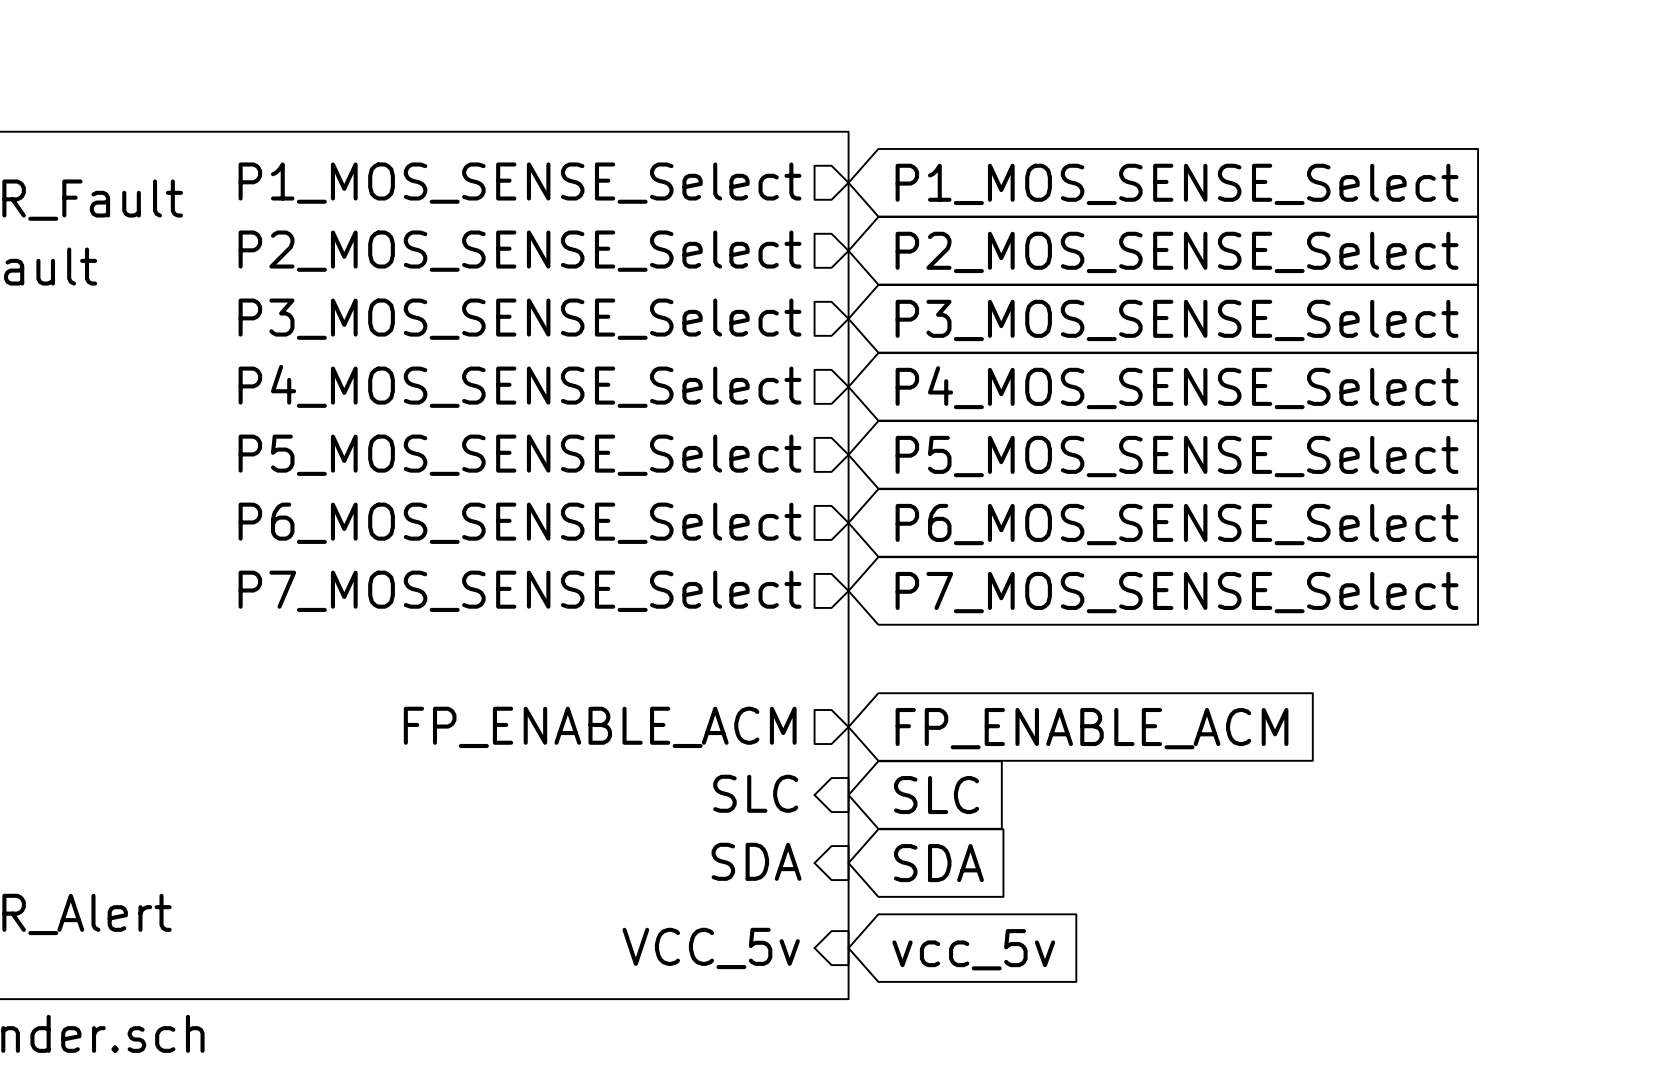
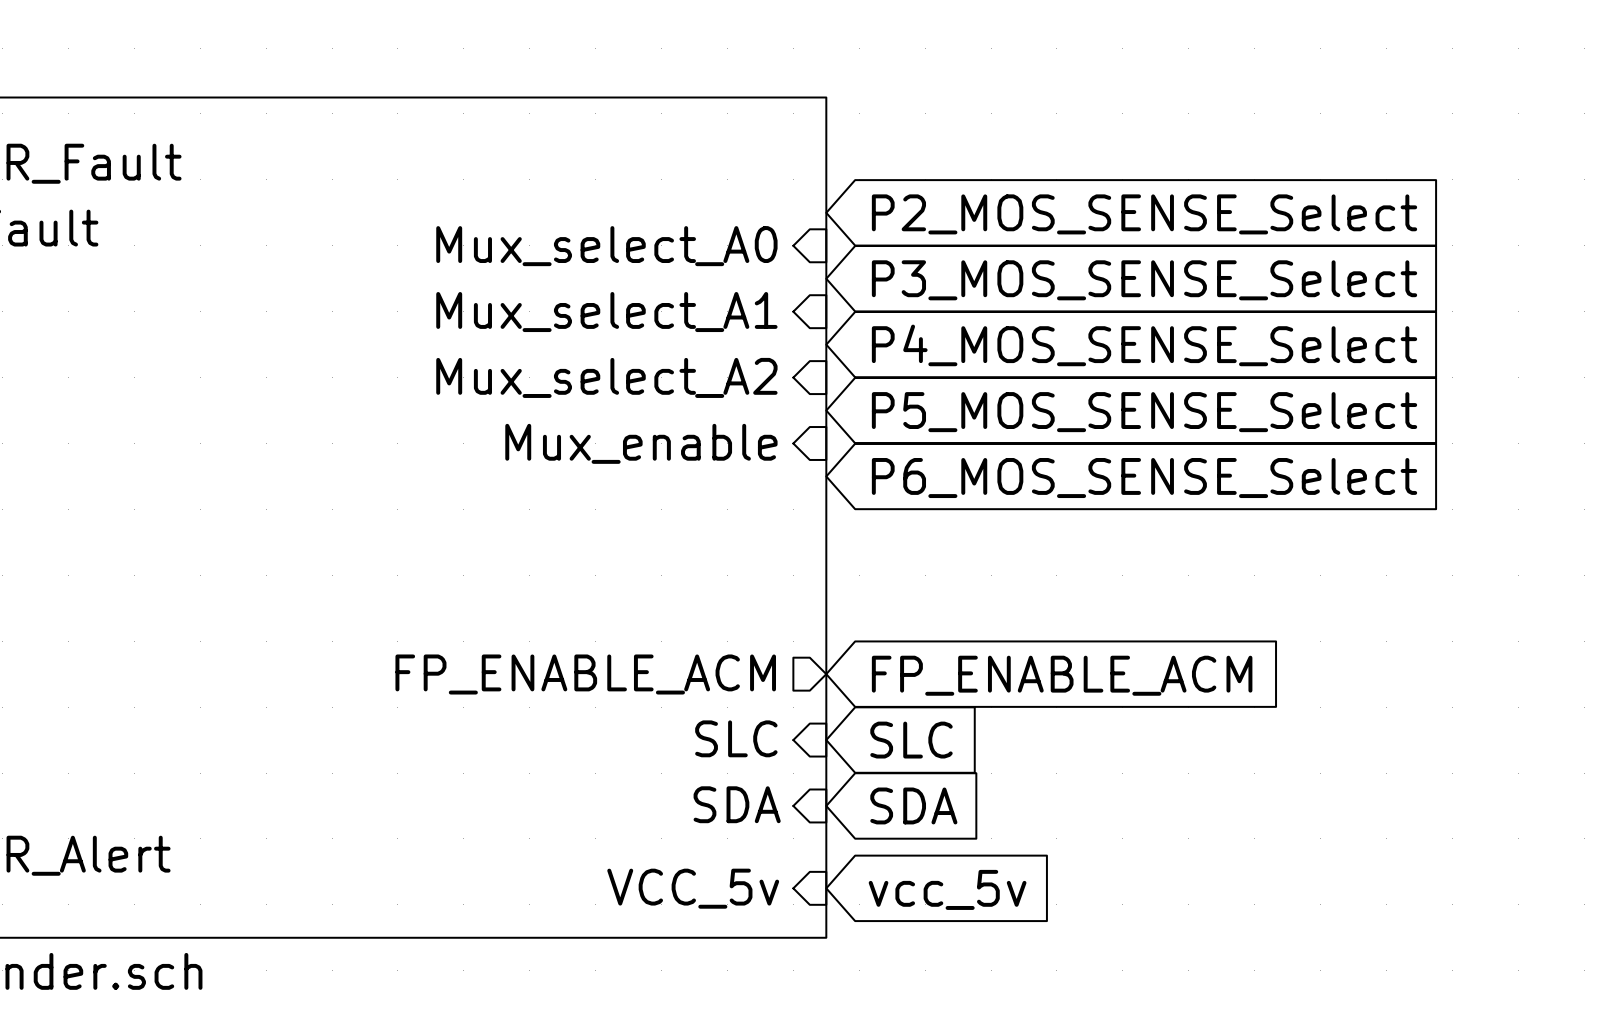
sheet pin: P1_MOS_SENSE_Select (520, 183) -> none
global label: P1_MOS_SENSE_Select (1177, 184) -> none
sheet pin: P2_MOS_SENSE_Select (520, 251) -> none
sheet pin: none -> Mux_select_A0 (606, 246)
sheet pin: P3_MOS_SENSE_Select (520, 319) -> none
sheet pin: none -> Mux_select_A1 (606, 312)
sheet pin: P4_MOS_SENSE_Select (520, 386) -> none
sheet pin: none -> Mux_select_A2 (606, 377)
sheet pin: P5_MOS_SENSE_Select (520, 455) -> none
sheet pin: none -> Mux_enable (641, 443)
sheet pin: P6_MOS_SENSE_Select (520, 523) -> none
sheet pin: P7_MOS_SENSE_Select (520, 591) -> none
global label: P7_MOS_SENSE_Select (1177, 592) -> none

